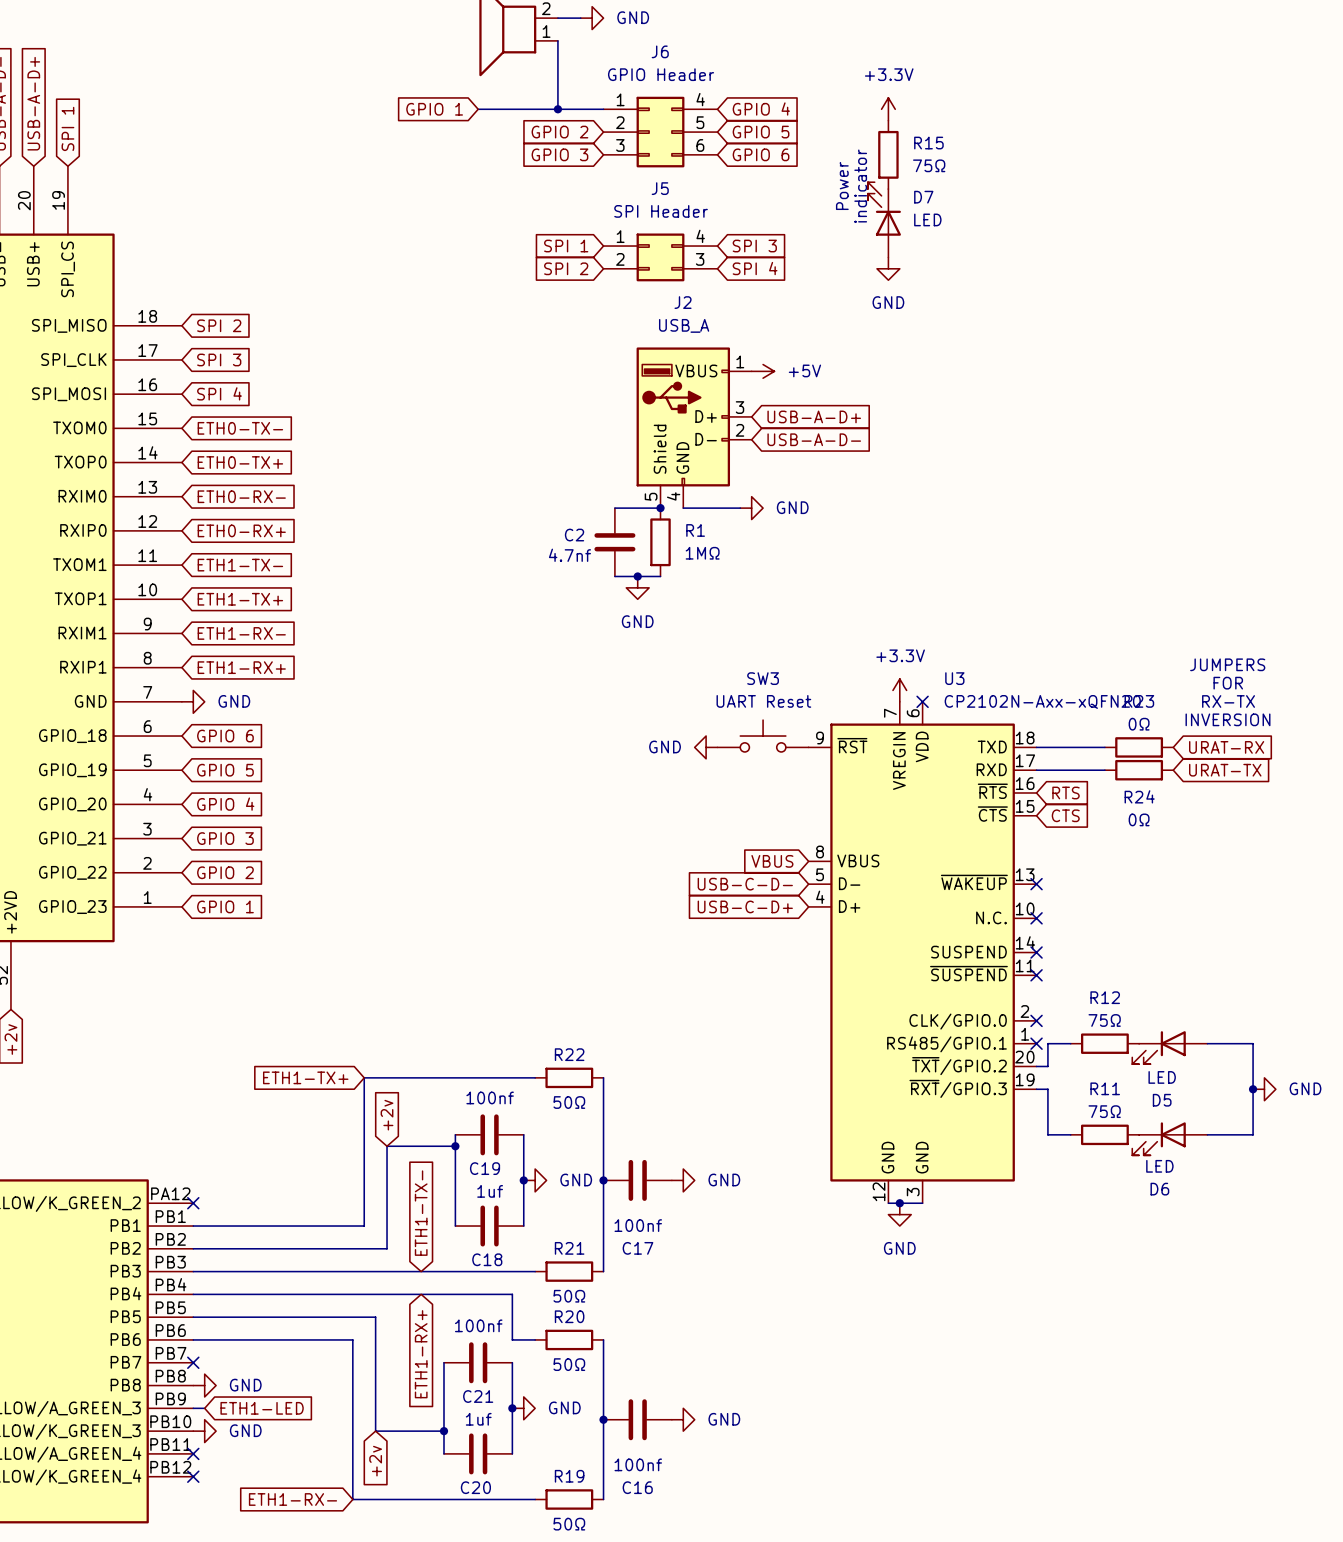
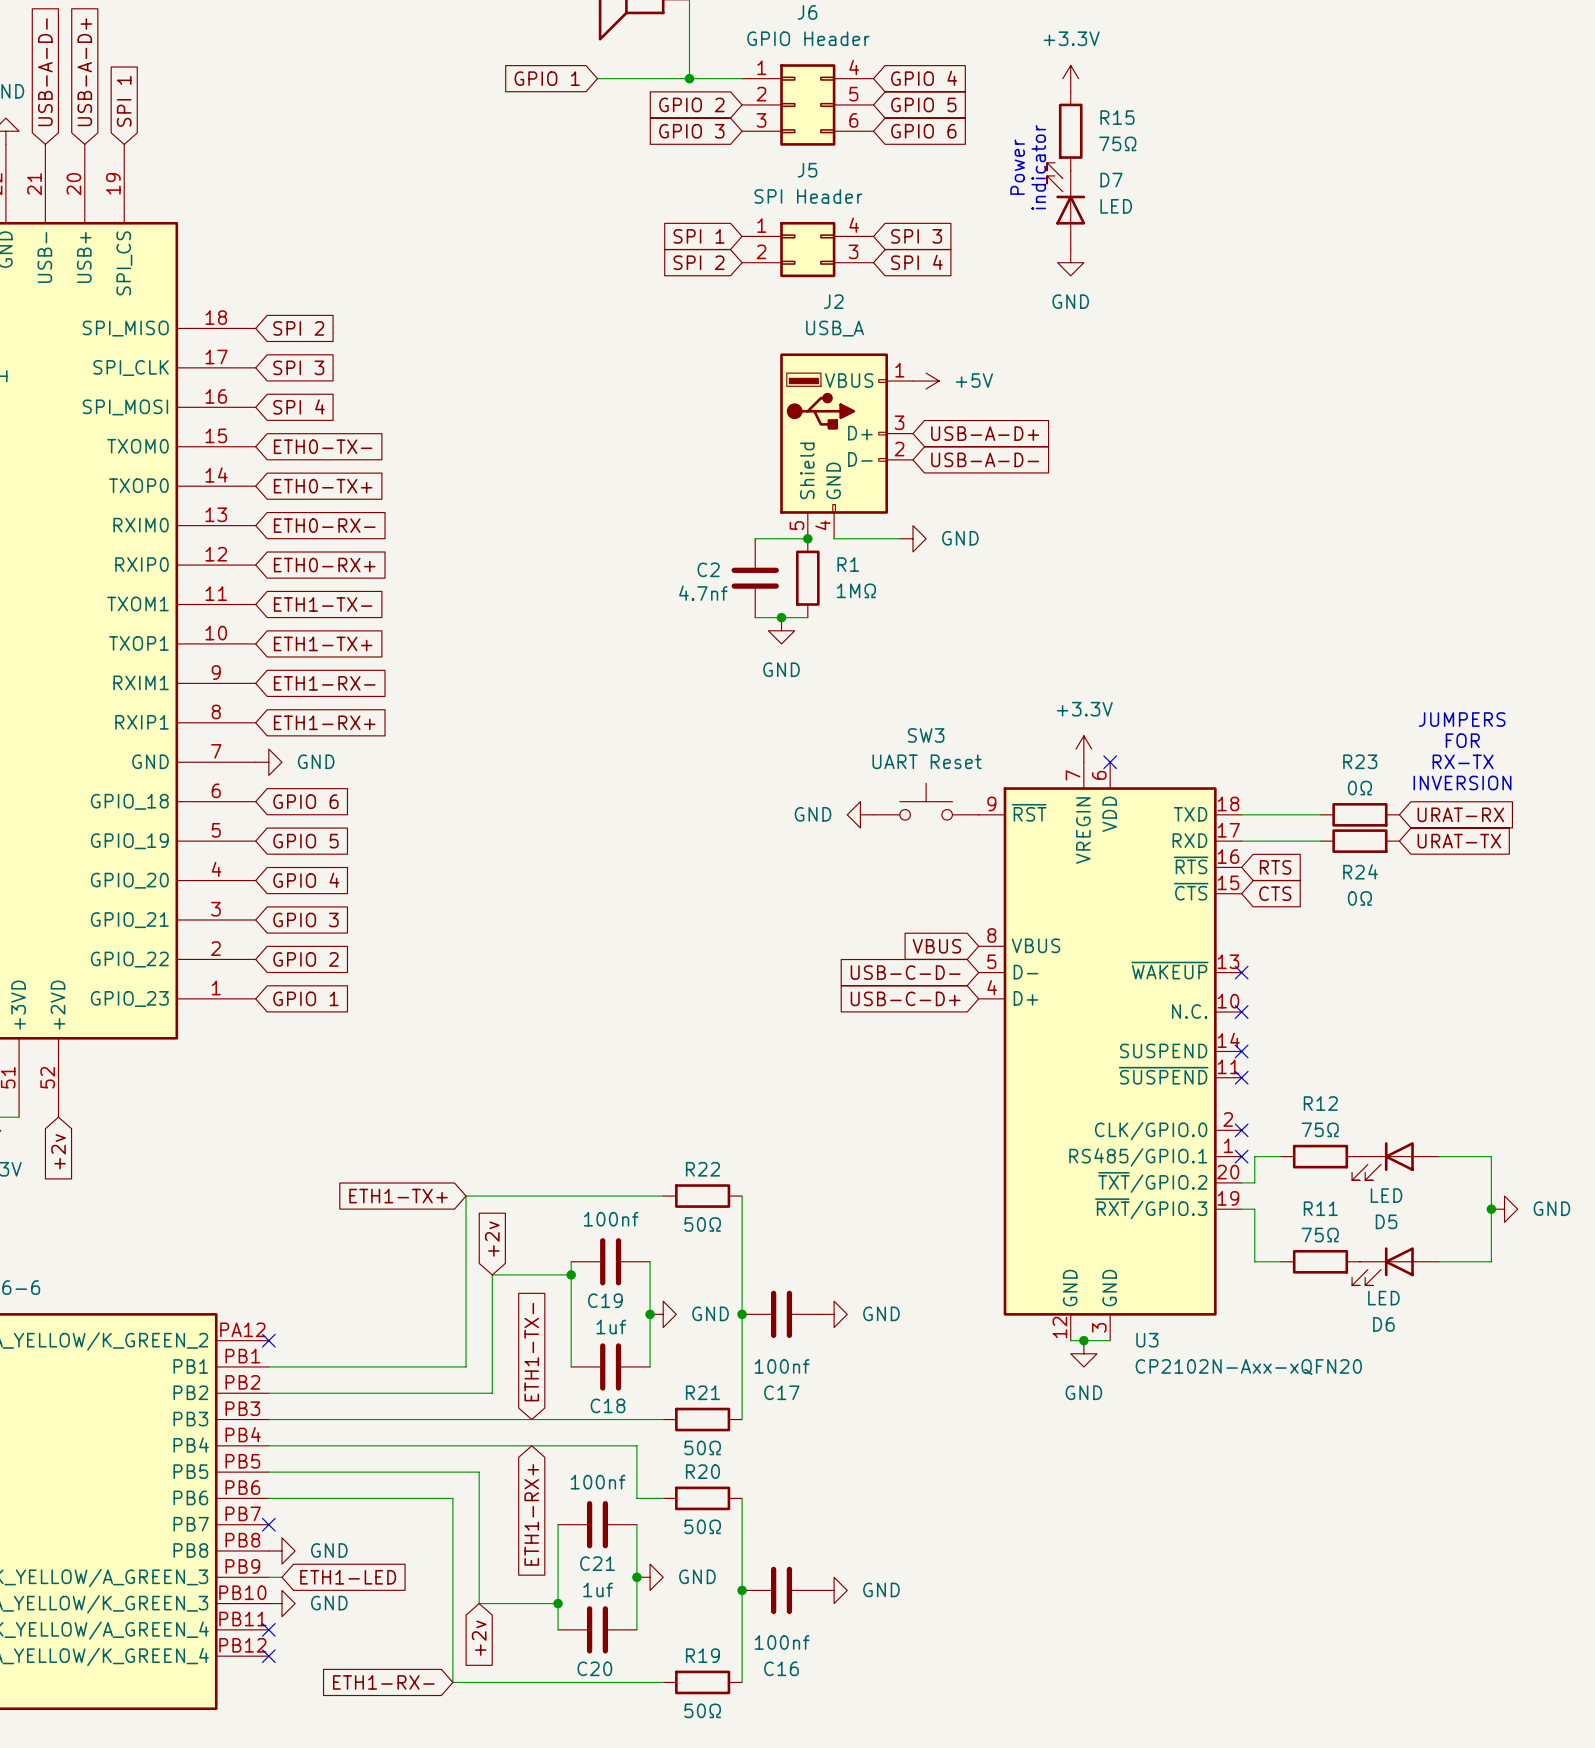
U3 name position: U3 (954, 678) -> U3 (1147, 1340)
U3 value position: CP2102N-Axx-xQFN20 (1042, 701) -> CP2102N-Axx-xQFN20 (1248, 1367)

